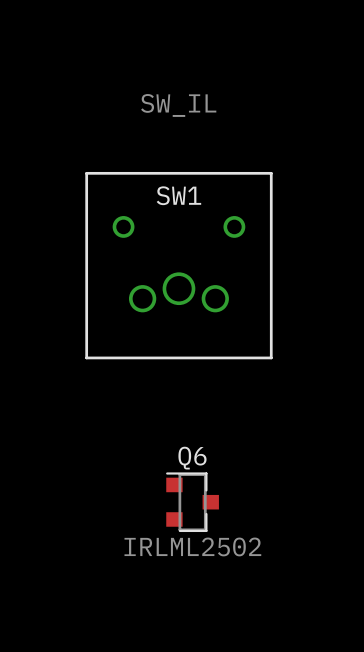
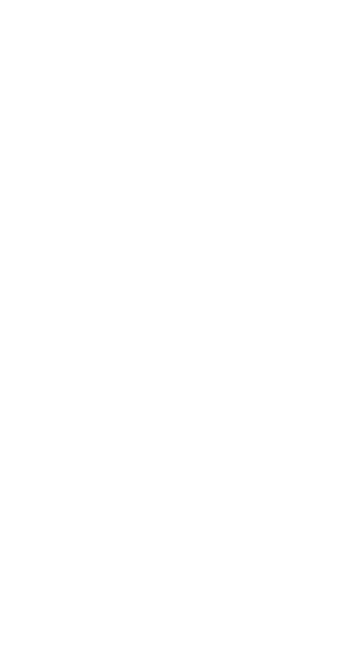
SW1: SW_IL (178, 265) -> none
Q6: IRLML2502 (192, 502) -> none

